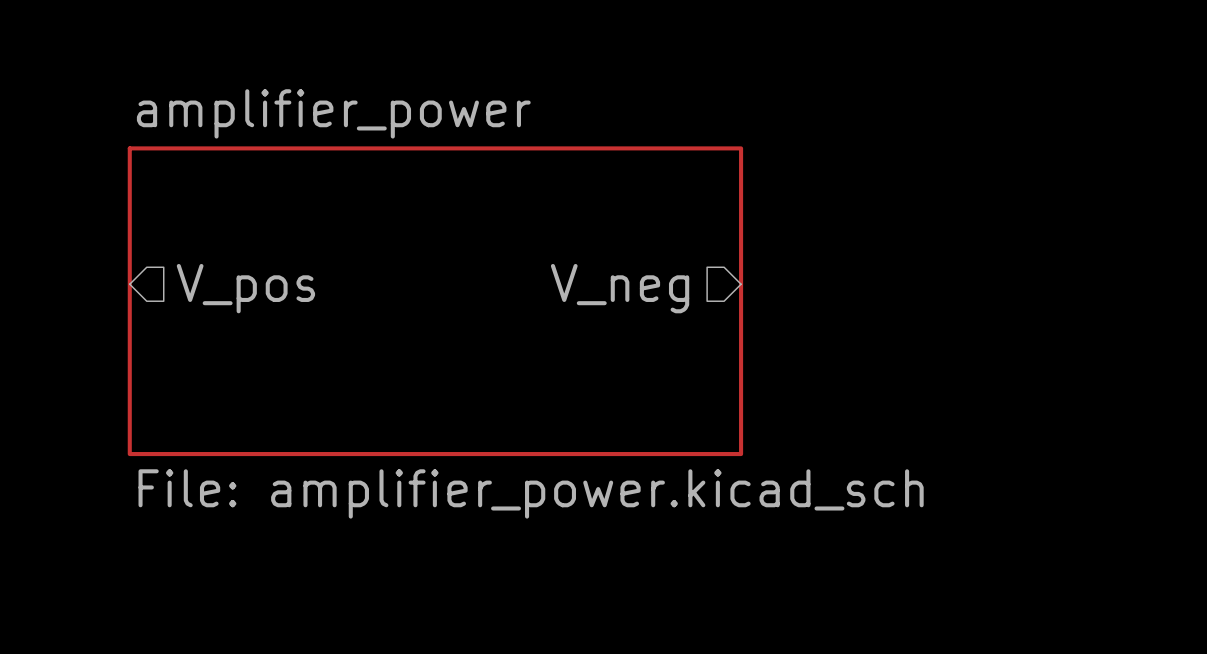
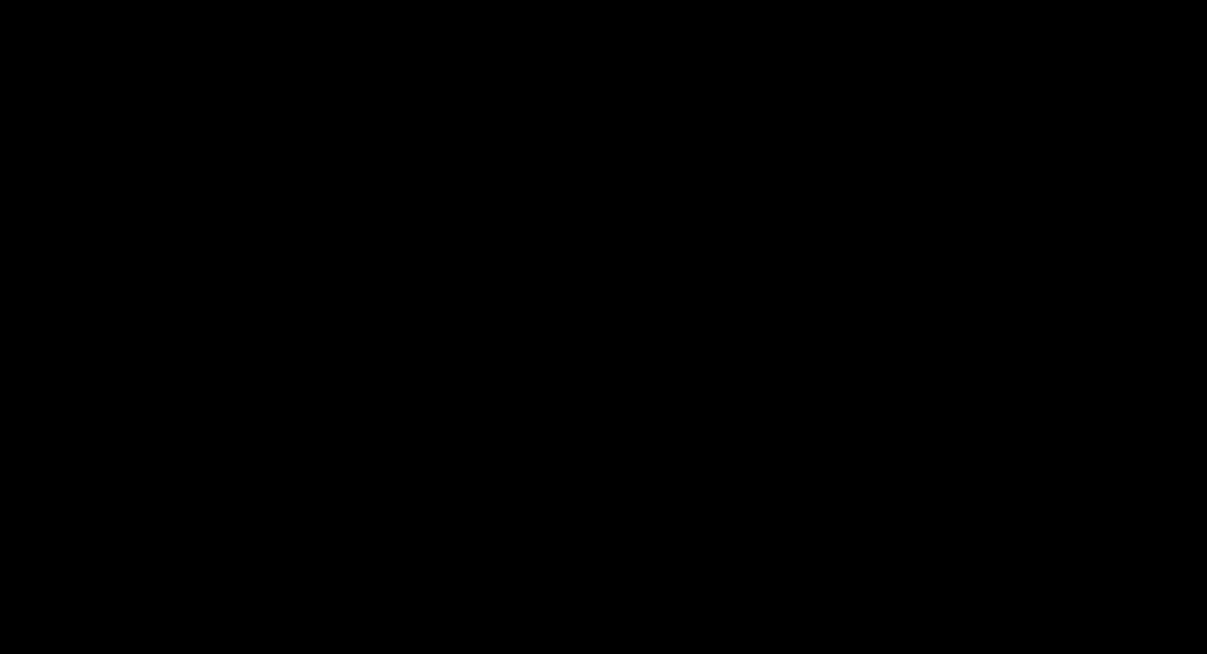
sheet pin: V_pos (245, 288) -> none
sheet pin: V_neg (620, 288) -> none
sheet amplifier_power: File: amplifier_power.kicad_sch (435, 301) -> none

